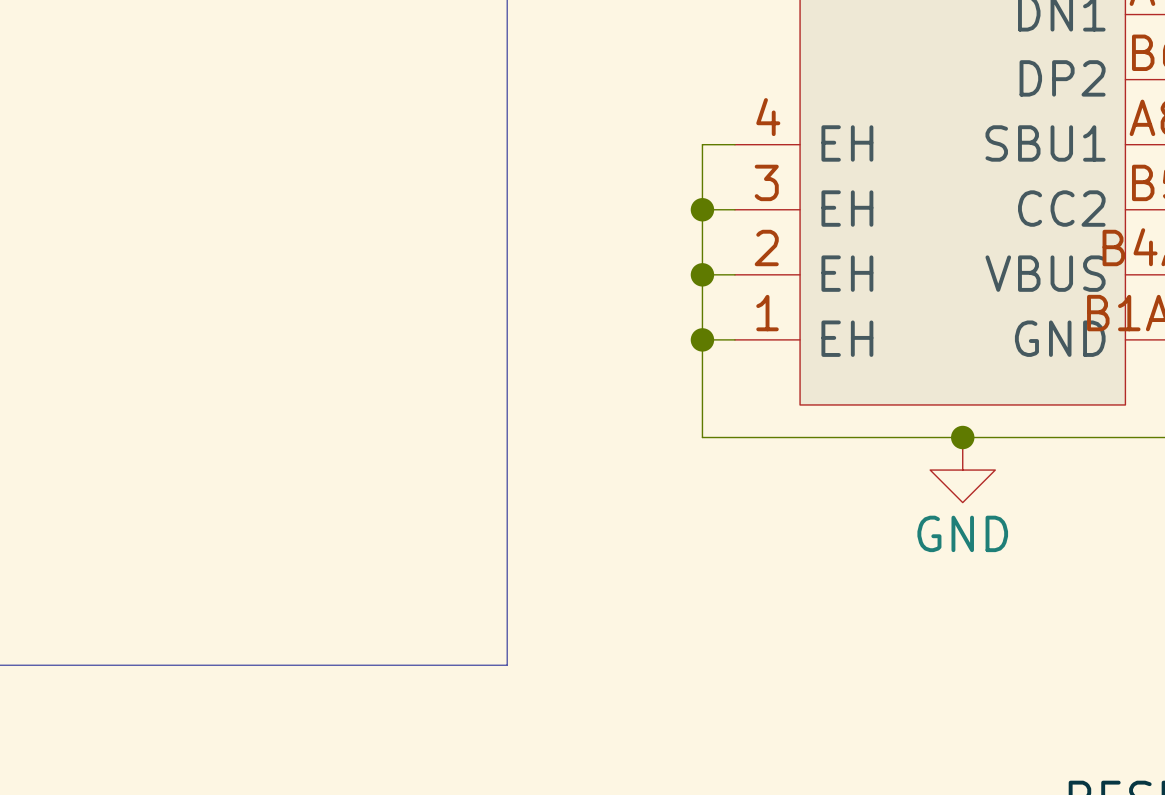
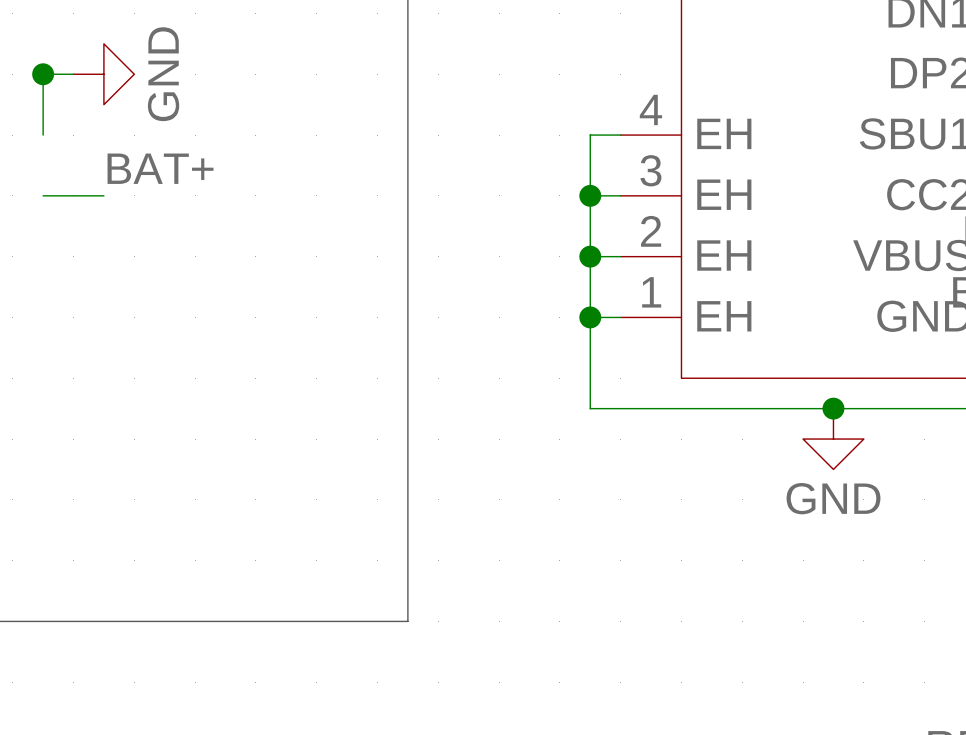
junction: none -> (43, 74)
wire: none -> (73, 74) (43, 74) (43, 135)
power symbol: none -> GND (103, 74)
label: none -> BAT+ (160, 168)
wire: none -> (43, 195) (103, 195)

